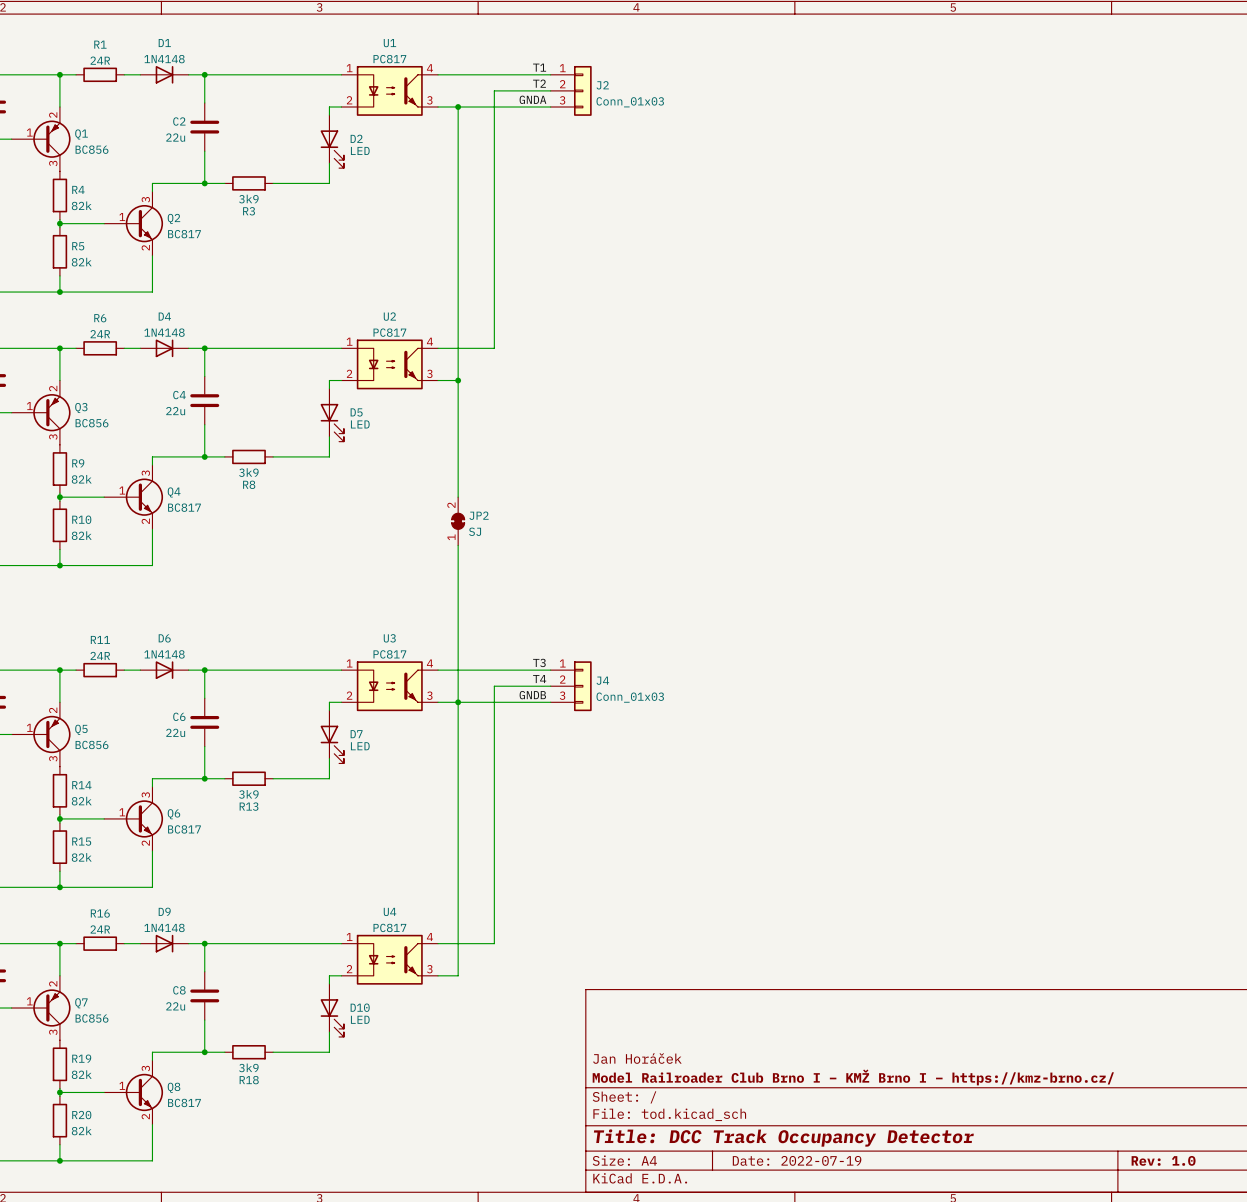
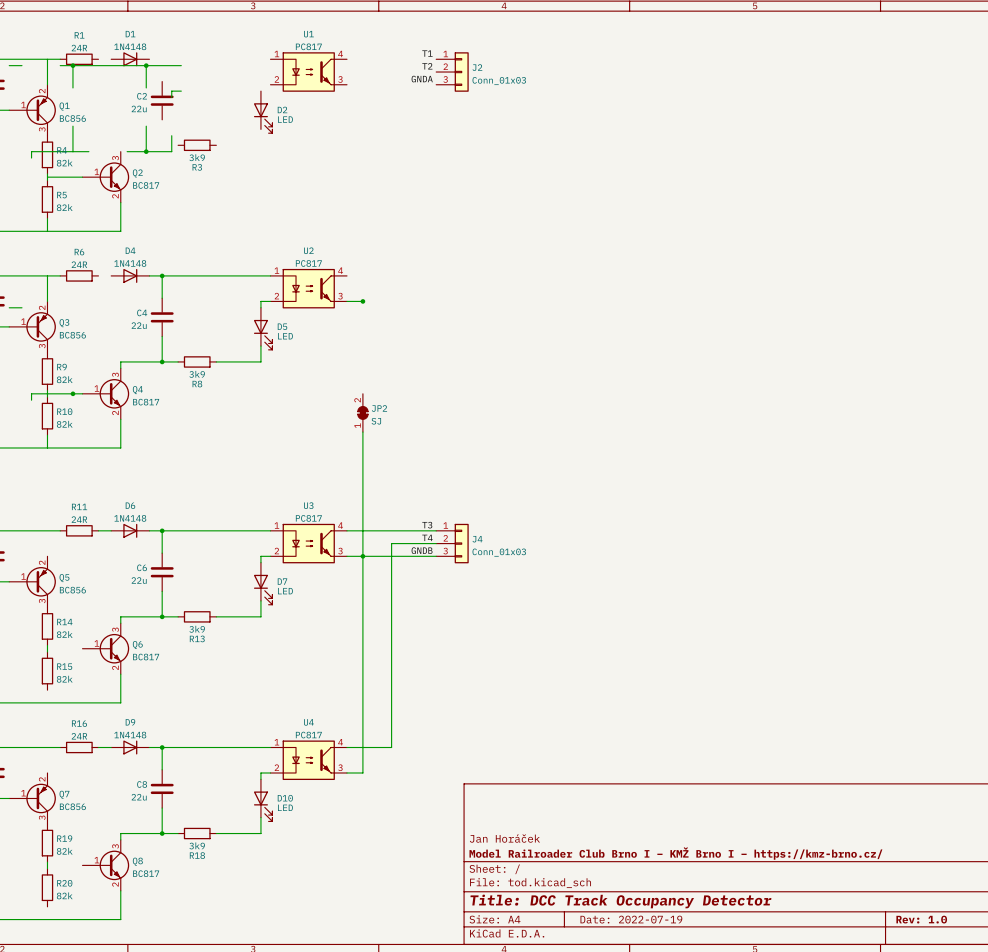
junction position: (59, 74) -> (72, 65)
wire: (124, 74) (140, 74) -> (9, 65) (21, 65)
wire: (188, 74) (341, 74) -> (60, 65) (181, 65)
wire: (204, 74) (204, 102) -> (72, 65) (72, 87)
junction position: (204, 74) -> (146, 65)
wire: (438, 74) (550, 74) -> none
wire: none -> (146, 65) (146, 87)
wire: (550, 90) (494, 90) (494, 348) (438, 348) -> none
wire: (341, 107) (329, 107) (329, 115) -> (181, 91) (171, 91) (171, 97)
wire: (438, 107) (550, 107) -> none
wire: (458, 107) (458, 497) -> none
junction: (458, 107) -> none
wire: (204, 151) (204, 183) -> (72, 126) (72, 151)
wire: none -> (146, 126) (146, 151)
wire: (329, 163) (329, 183) (273, 183) -> (171, 135) (171, 151) (127, 151)
junction position: (204, 183) -> (146, 151)
wire: (224, 183) (152, 183) (152, 191) -> (88, 151) (31, 151) (31, 158)
junction: (59, 223) -> none
junction: (59, 292) -> none
junction: (59, 348) -> none
wire: (124, 348) (140, 348) -> (9, 307) (21, 307)
wire: none -> (47, 393) (31, 393) (31, 400)
junction position: (59, 497) -> (72, 393)
junction: (59, 565) -> none
wire: (59, 670) (59, 702) -> none
junction: (59, 670) -> none
wire: (59, 818) (104, 818) -> none
junction: (59, 818) -> none
wire: (59, 871) (59, 887) -> none
junction: (59, 887) -> none
wire: (59, 943) (59, 975) -> none
junction: (59, 943) -> none
wire: (59, 1092) (104, 1092) -> none
junction: (59, 1092) -> none
wire: (59, 1144) (59, 1160) -> none
junction: (59, 1160) -> none

